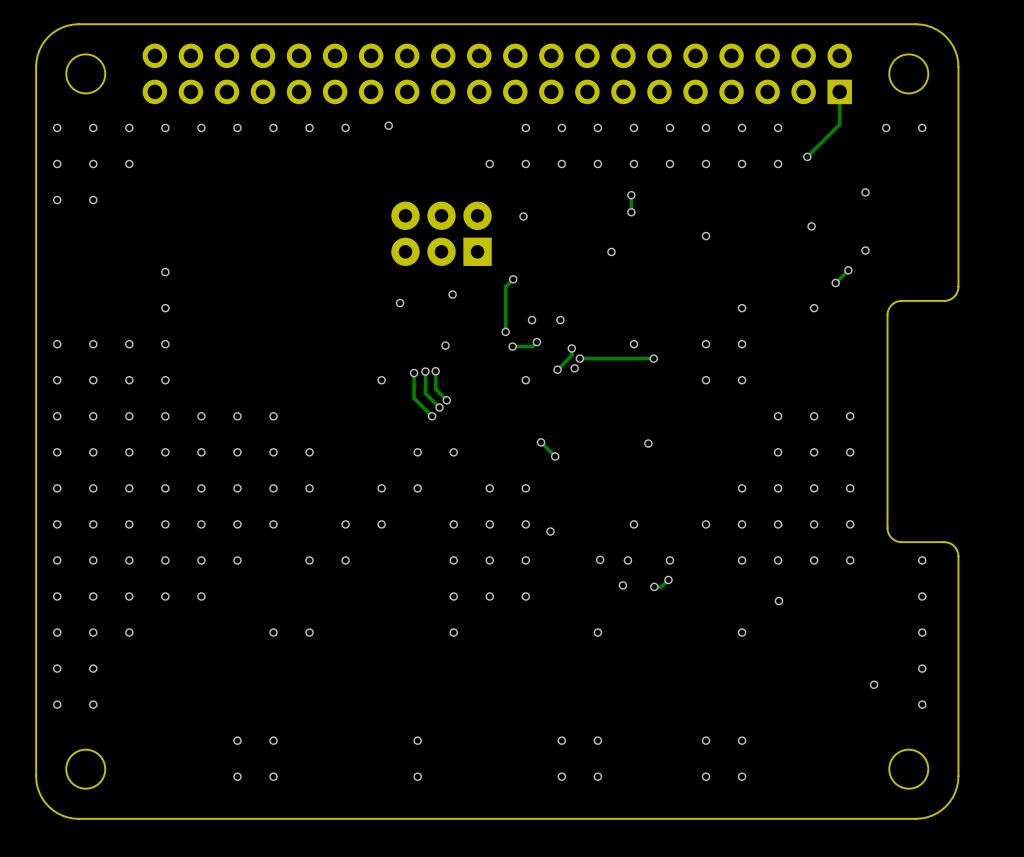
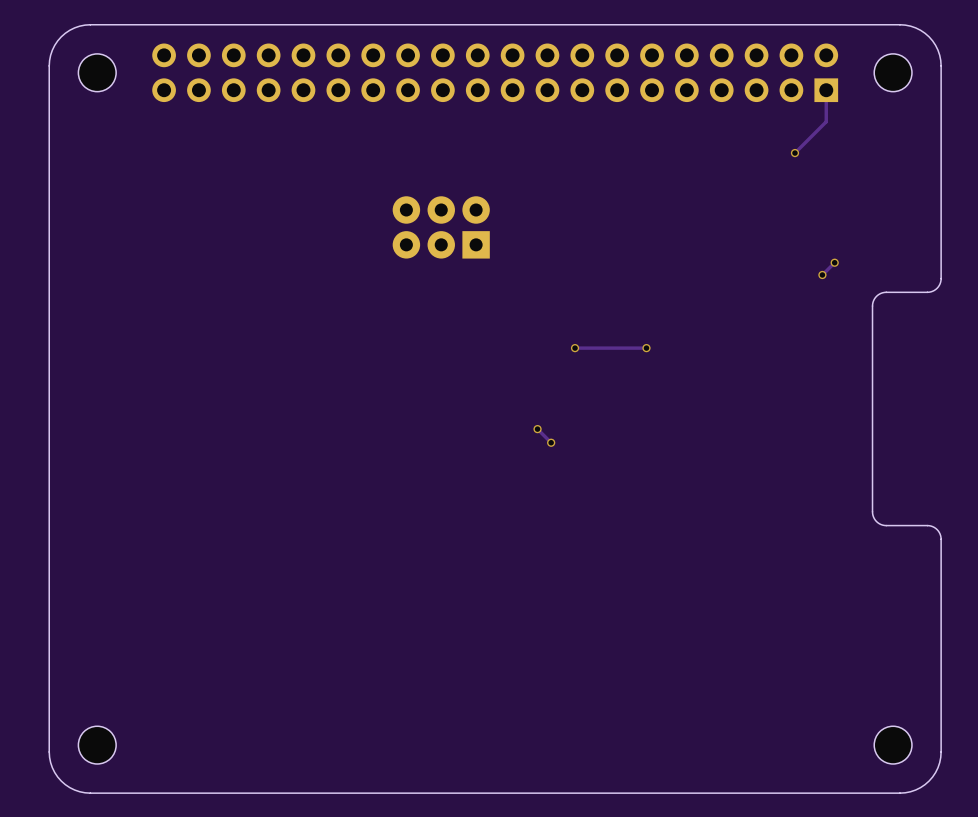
via: (388, 125) -> none
via: (57, 127) -> none
via: (93, 127) -> none
via: (129, 127) -> none
via: (165, 127) -> none
via: (201, 127) -> none
via: (237, 127) -> none
via: (273, 127) -> none
via: (309, 127) -> none
via: (345, 127) -> none
via: (525, 127) -> none
via: (561, 127) -> none
via: (597, 127) -> none
via: (633, 127) -> none
via: (669, 127) -> none
via: (706, 127) -> none
via: (742, 127) -> none
via: (778, 127) -> none
via: (886, 127) -> none
via: (922, 127) -> none
via: (57, 163) -> none
via: (93, 163) -> none
via: (129, 163) -> none
via: (489, 163) -> none
via: (525, 163) -> none
via: (561, 163) -> none
via: (597, 163) -> none
via: (633, 163) -> none
via: (669, 163) -> none
via: (706, 163) -> none
via: (742, 163) -> none
via: (778, 163) -> none
via: (865, 192) -> none
track: (631, 195) (631, 212) -> none
via: (631, 195) -> none
via: (57, 200) -> none
via: (93, 200) -> none
via: (631, 212) -> none
via: (523, 216) -> none
via: (811, 226) -> none
via: (706, 236) -> none
via: (865, 250) -> none
via: (611, 251) -> none
via: (165, 272) -> none
track: (513, 279) (505, 286) (505, 331) -> none
via: (513, 279) -> none
via: (452, 294) -> none
via: (400, 303) -> none
via: (165, 308) -> none
via: (742, 308) -> none
via: (814, 308) -> none
via: (532, 320) -> none
via: (560, 320) -> none
via: (505, 331) -> none
track: (536, 342) (532, 346) (512, 346) -> none
via: (536, 342) -> none
via: (57, 344) -> none
via: (93, 344) -> none
via: (129, 344) -> none
via: (165, 344) -> none
via: (633, 344) -> none
via: (706, 344) -> none
via: (742, 344) -> none
via: (445, 345) -> none
via: (512, 346) -> none
track: (571, 348) (571, 355) (557, 369) -> none
via: (571, 348) -> none
via: (574, 368) -> none
via: (557, 369) -> none
track: (425, 371) (425, 393) (439, 407) -> none
via: (425, 371) -> none
track: (435, 371) (435, 389) (446, 400) -> none
via: (435, 371) -> none
track: (414, 373) (414, 398) (432, 416) -> none
via: (414, 373) -> none
via: (57, 380) -> none
via: (93, 380) -> none
via: (129, 380) -> none
via: (165, 380) -> none
via: (381, 380) -> none
via: (525, 380) -> none
via: (706, 380) -> none
via: (742, 380) -> none
via: (446, 400) -> none
via: (439, 407) -> none
via: (57, 416) -> none
via: (93, 416) -> none
via: (129, 416) -> none
via: (165, 416) -> none
via: (201, 416) -> none
via: (237, 416) -> none
via: (273, 416) -> none
via: (432, 416) -> none
via: (778, 416) -> none
via: (814, 416) -> none
via: (850, 416) -> none
via: (648, 443) -> none
via: (57, 452) -> none
via: (93, 452) -> none
via: (129, 452) -> none
via: (165, 452) -> none
via: (201, 452) -> none
via: (237, 452) -> none
via: (273, 452) -> none
via: (309, 452) -> none
via: (417, 452) -> none
via: (453, 452) -> none
via: (778, 452) -> none
via: (814, 452) -> none
via: (850, 452) -> none
via: (57, 488) -> none
via: (93, 488) -> none
via: (129, 488) -> none
via: (165, 488) -> none
via: (201, 488) -> none
via: (237, 488) -> none
via: (273, 488) -> none
via: (309, 488) -> none
via: (381, 488) -> none
via: (417, 488) -> none
via: (489, 488) -> none
via: (525, 488) -> none
via: (742, 488) -> none
via: (778, 488) -> none
via: (814, 488) -> none
via: (850, 488) -> none
via: (57, 524) -> none
via: (93, 524) -> none
via: (129, 524) -> none
via: (165, 524) -> none
via: (201, 524) -> none
via: (237, 524) -> none
via: (273, 524) -> none
via: (345, 524) -> none
via: (381, 524) -> none
via: (453, 524) -> none
via: (489, 524) -> none
via: (525, 524) -> none
via: (633, 524) -> none
via: (706, 524) -> none
via: (742, 524) -> none
via: (778, 524) -> none
via: (814, 524) -> none
via: (850, 524) -> none
via: (550, 531) -> none
via: (600, 559) -> none
via: (57, 560) -> none
via: (93, 560) -> none
via: (129, 560) -> none
via: (165, 560) -> none
via: (201, 560) -> none
via: (237, 560) -> none
via: (309, 560) -> none
via: (345, 560) -> none
via: (453, 560) -> none
via: (489, 560) -> none
via: (525, 560) -> none
via: (627, 560) -> none
via: (669, 560) -> none
via: (742, 560) -> none
via: (778, 560) -> none
via: (814, 560) -> none
via: (850, 560) -> none
via: (922, 560) -> none
track: (668, 579) (661, 586) (654, 586) -> none
via: (668, 579) -> none
via: (622, 585) -> none
via: (654, 586) -> none
via: (57, 596) -> none
via: (93, 596) -> none
via: (129, 596) -> none
via: (165, 596) -> none
via: (201, 596) -> none
via: (453, 596) -> none
via: (489, 596) -> none
via: (525, 596) -> none
via: (922, 596) -> none
via: (778, 601) -> none
via: (57, 632) -> none
via: (93, 632) -> none
via: (129, 632) -> none
via: (273, 632) -> none
via: (309, 632) -> none
via: (453, 632) -> none
via: (597, 632) -> none
via: (742, 632) -> none
via: (922, 632) -> none
via: (57, 668) -> none
via: (93, 668) -> none
via: (922, 668) -> none
via: (874, 684) -> none
via: (57, 704) -> none
via: (93, 704) -> none
via: (922, 704) -> none
via: (237, 740) -> none
via: (273, 740) -> none
via: (417, 740) -> none
via: (561, 740) -> none
via: (597, 740) -> none
via: (706, 740) -> none
via: (742, 740) -> none
via: (237, 776) -> none
via: (273, 776) -> none
via: (417, 776) -> none
via: (561, 776) -> none
via: (597, 776) -> none
via: (706, 776) -> none
via: (742, 776) -> none

